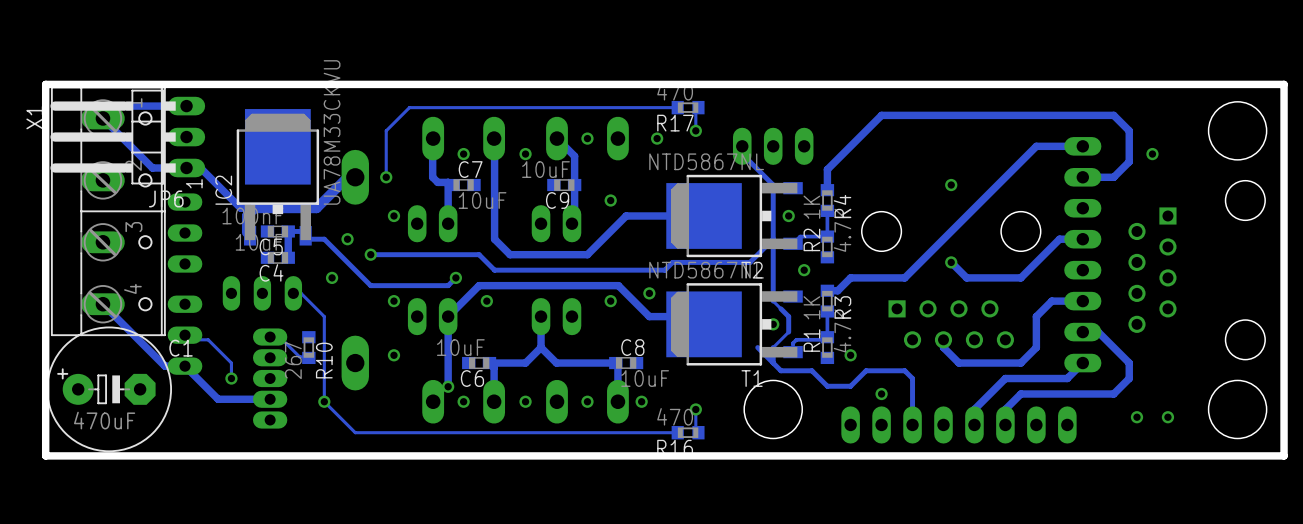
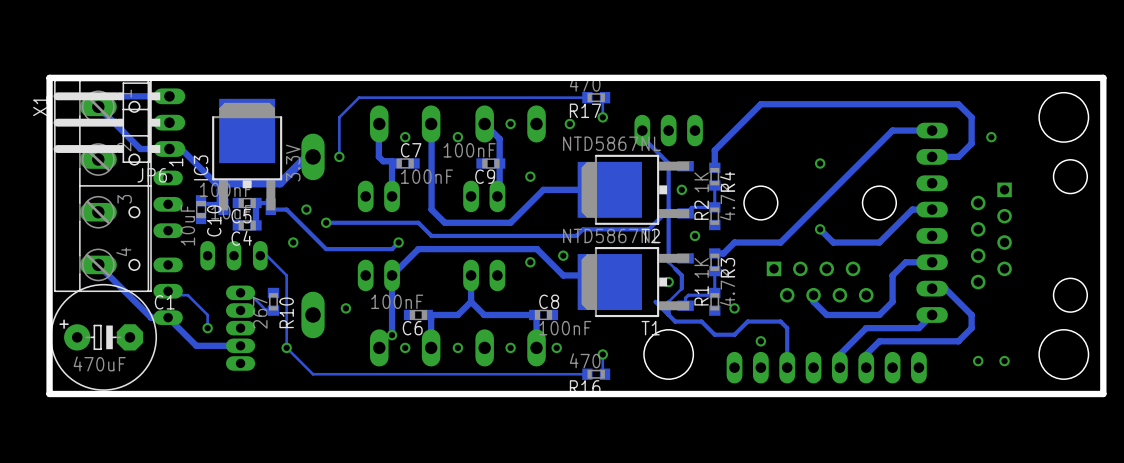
IC2 value: UA78M33CKVU (332, 132) -> 3.3V (293, 163)
C9 value: 10uF (545, 169) -> 100nF (469, 150)
IC2 name: IC2 (223, 190) -> IC3 (201, 167)
C7 value: 10uF (482, 200) -> 100nF (426, 176)
via: (393, 215) -> none
track: none -> (201, 200) (204, 204) (220, 204)
C10: none -> 10uF (201, 209)
via: (393, 301) -> none
via: (486, 301) -> none
C6 value: 10uF (460, 347) -> 100nF (397, 301)
C8 value: 10uF (645, 378) -> 100nF (565, 328)

